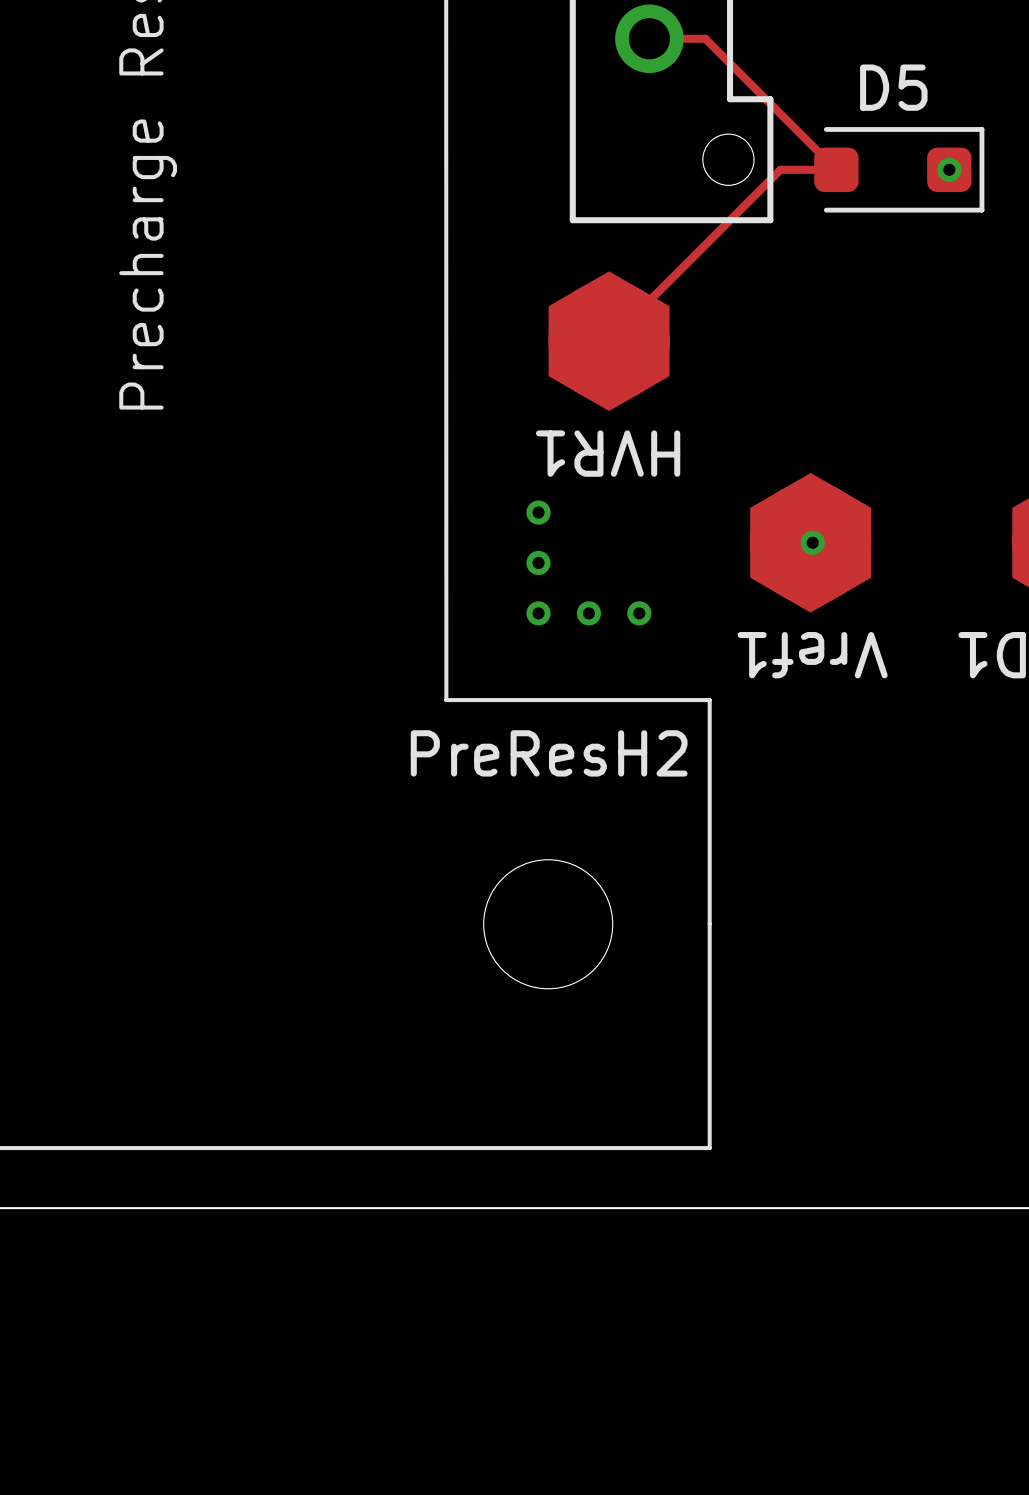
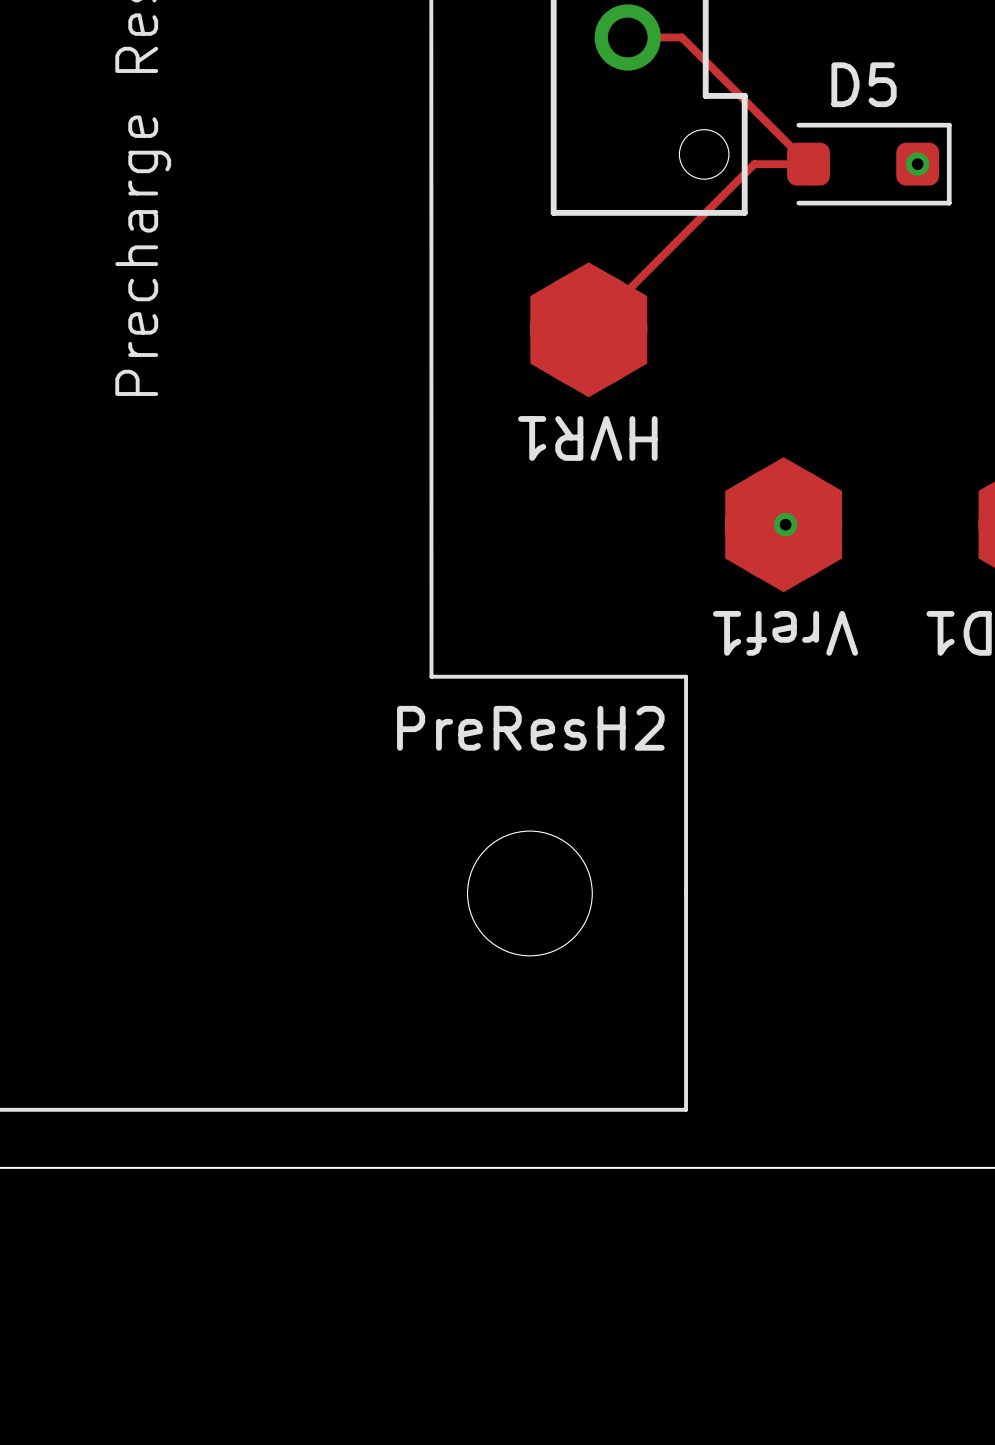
via: (538, 512) -> none
via: (538, 562) -> none
via: (538, 613) -> none
via: (588, 613) -> none
via: (639, 613) -> none

